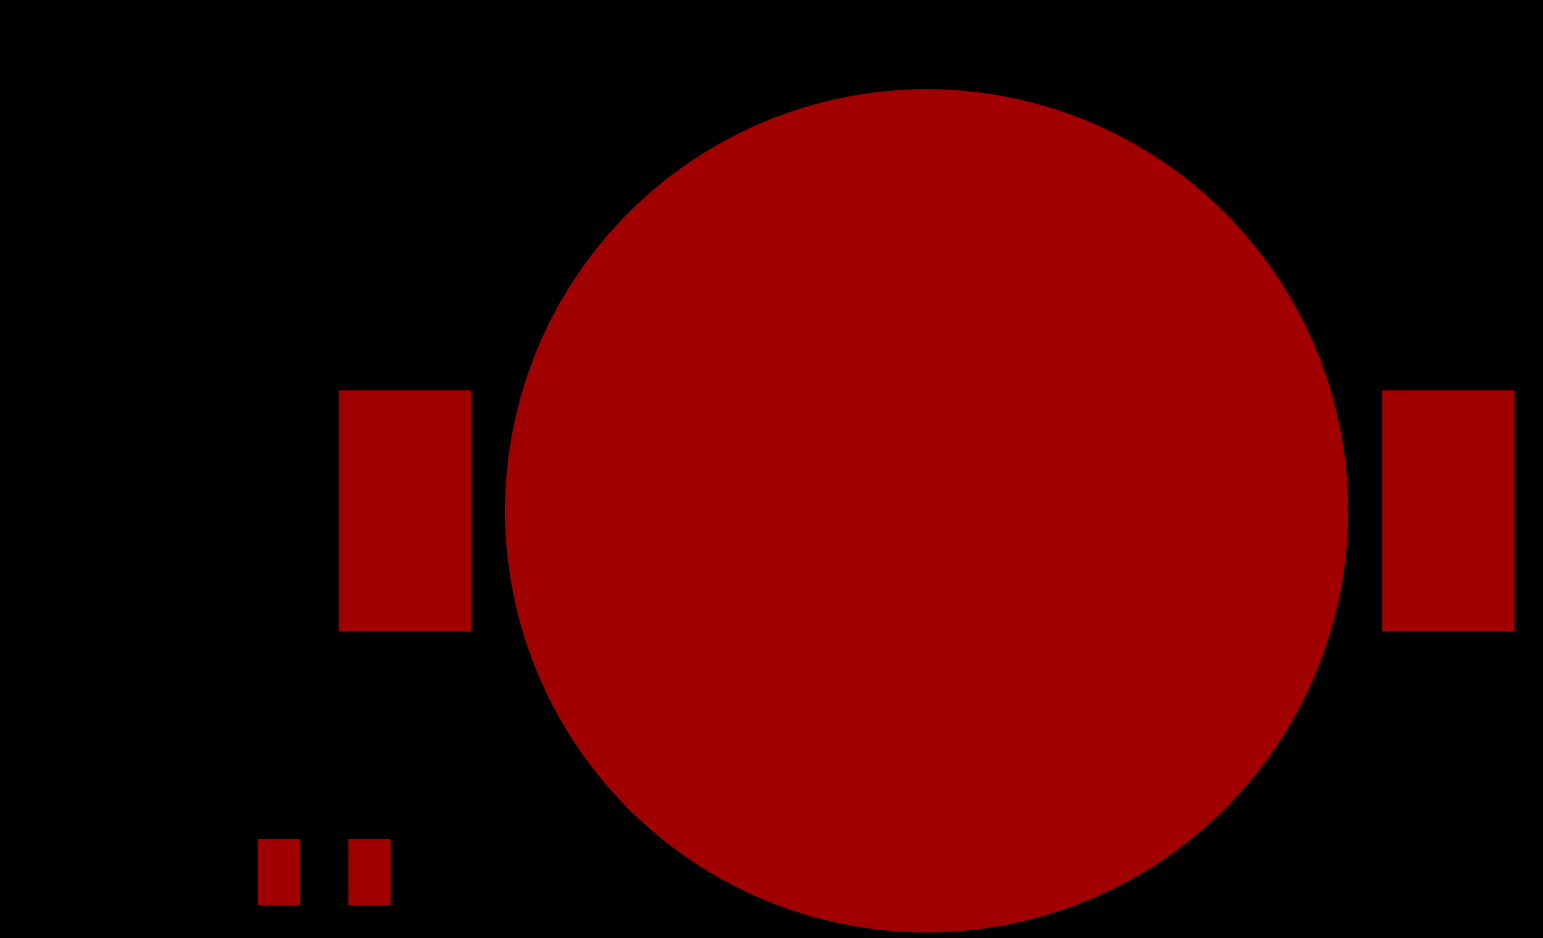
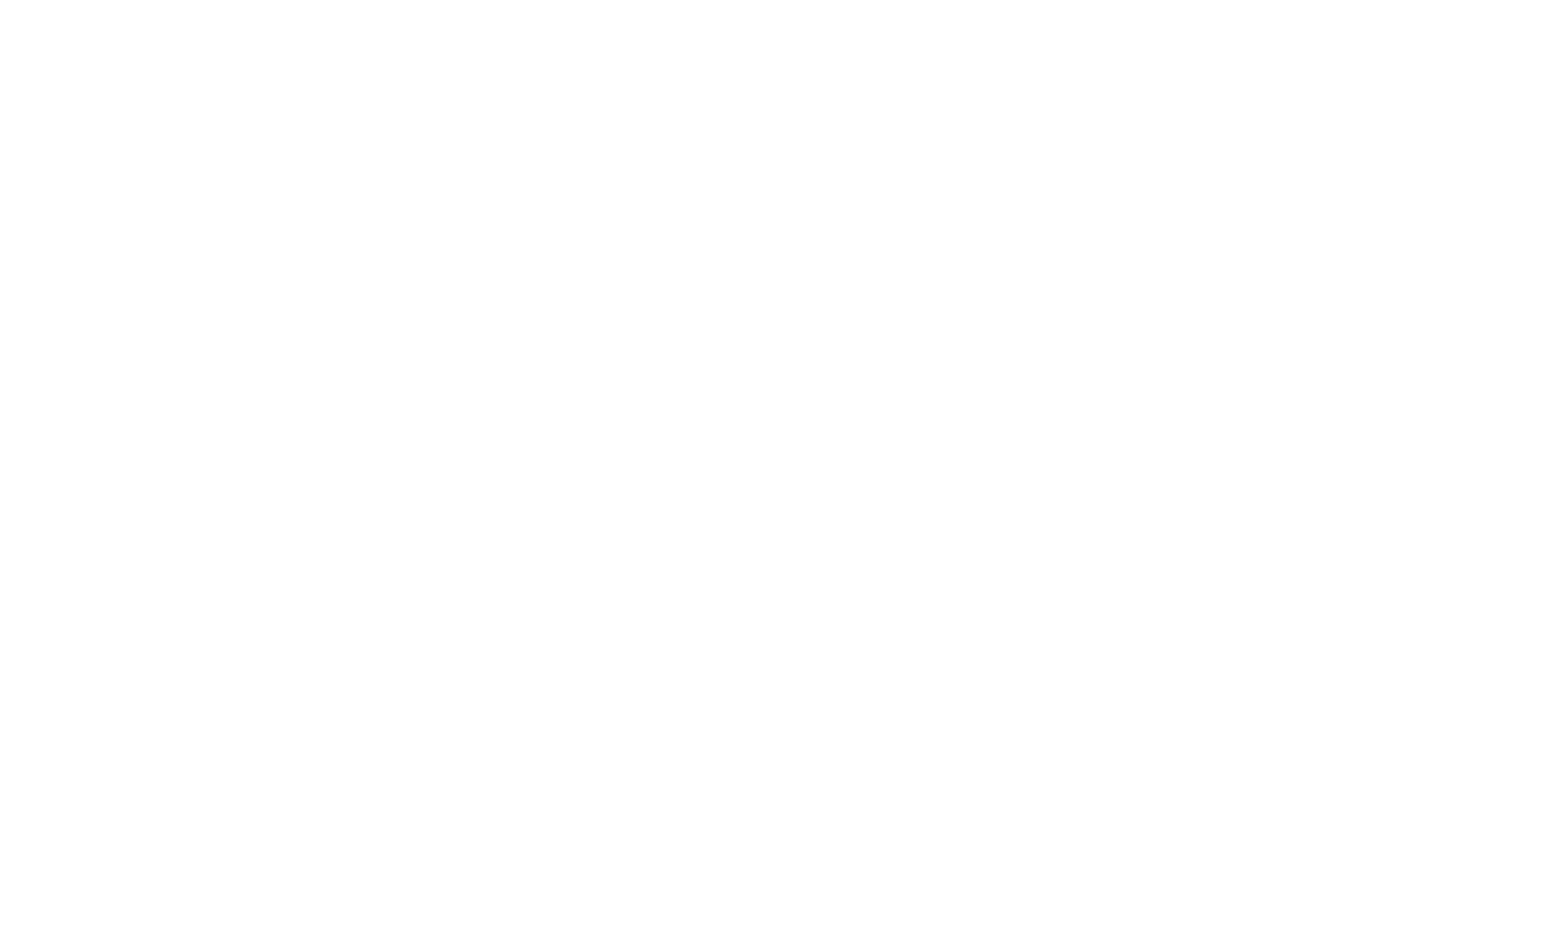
part: (926, 510) -> none
part: (324, 872) -> none

